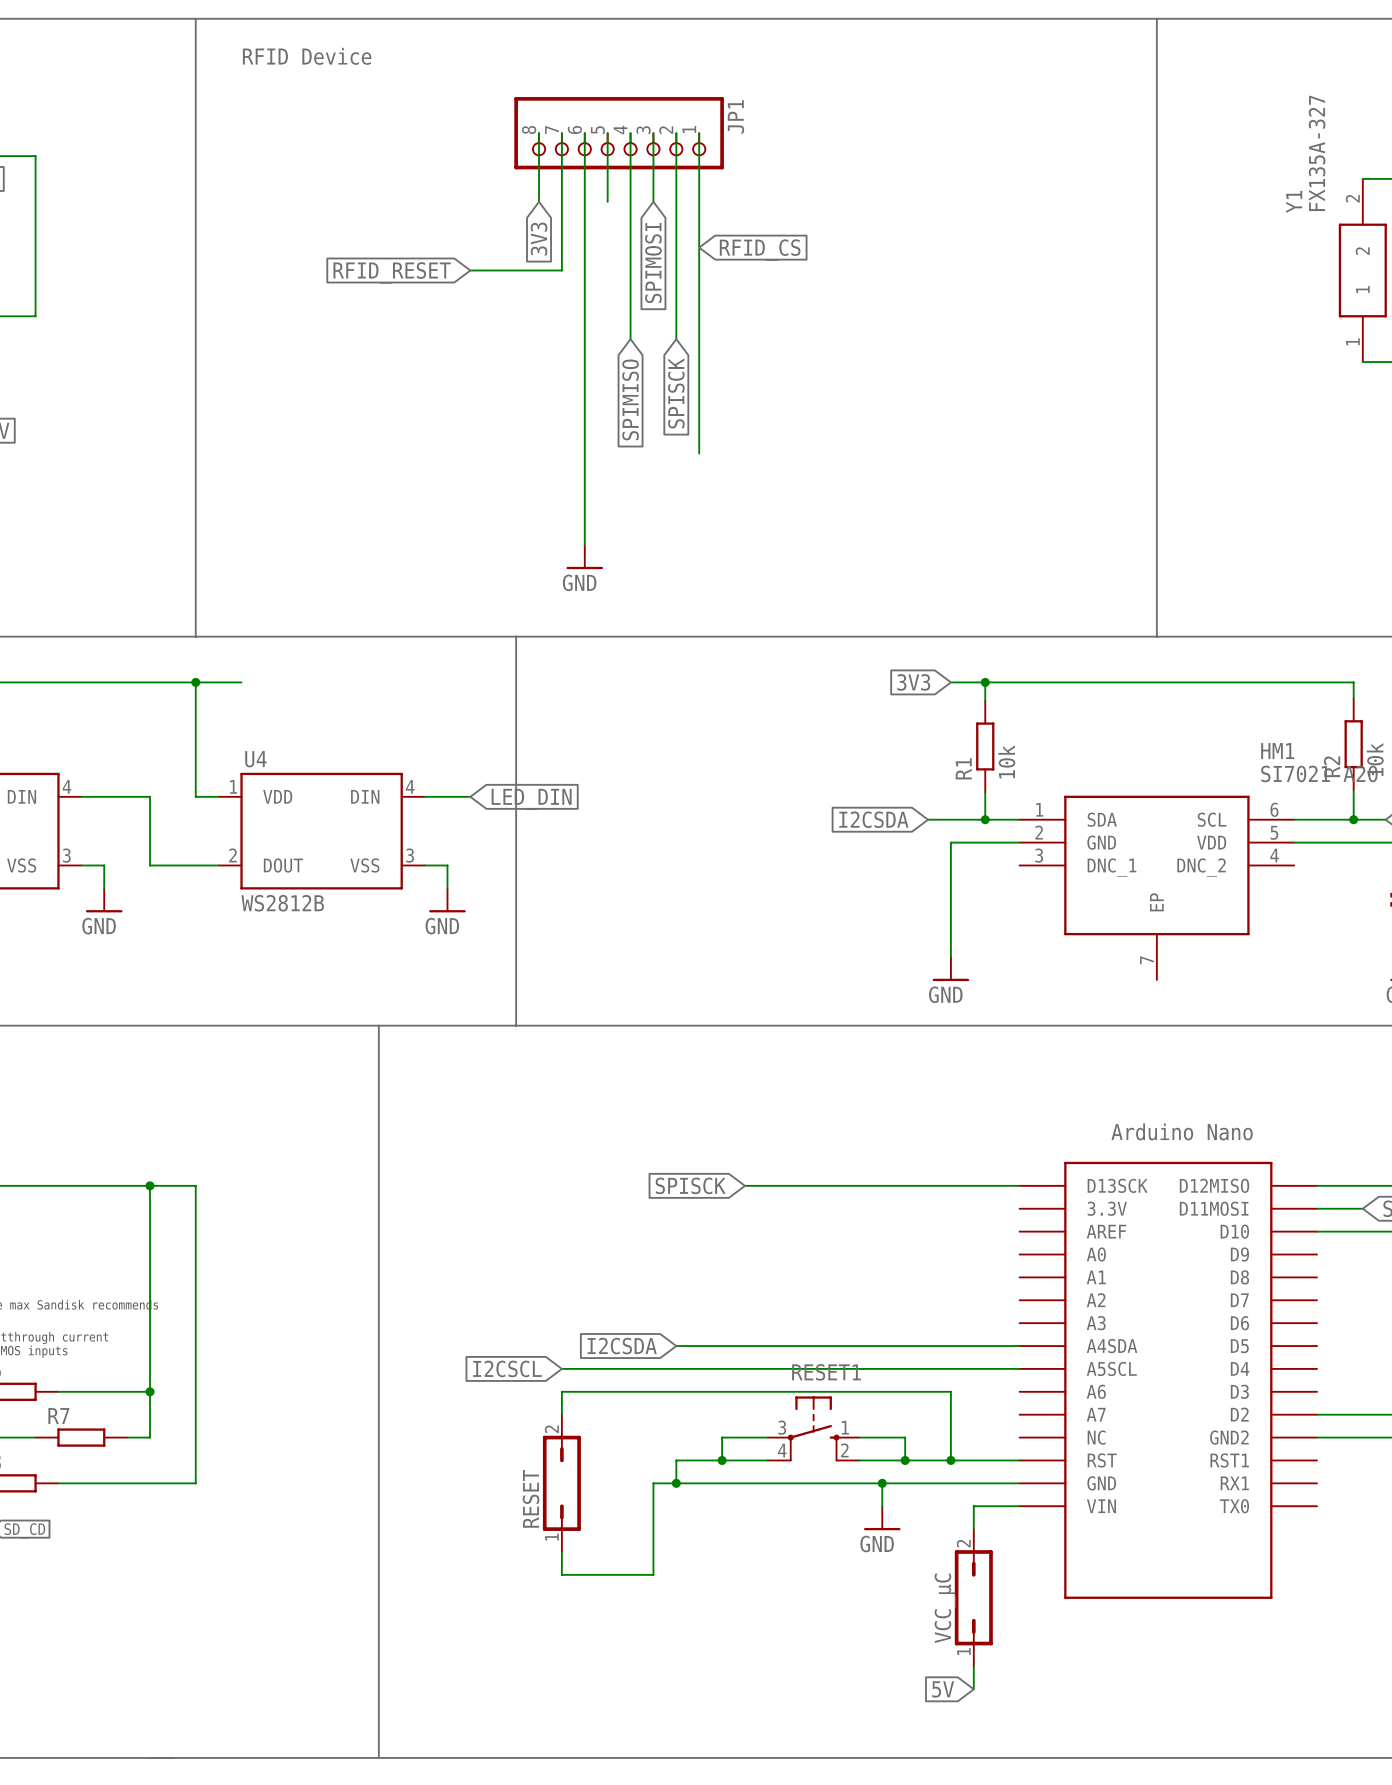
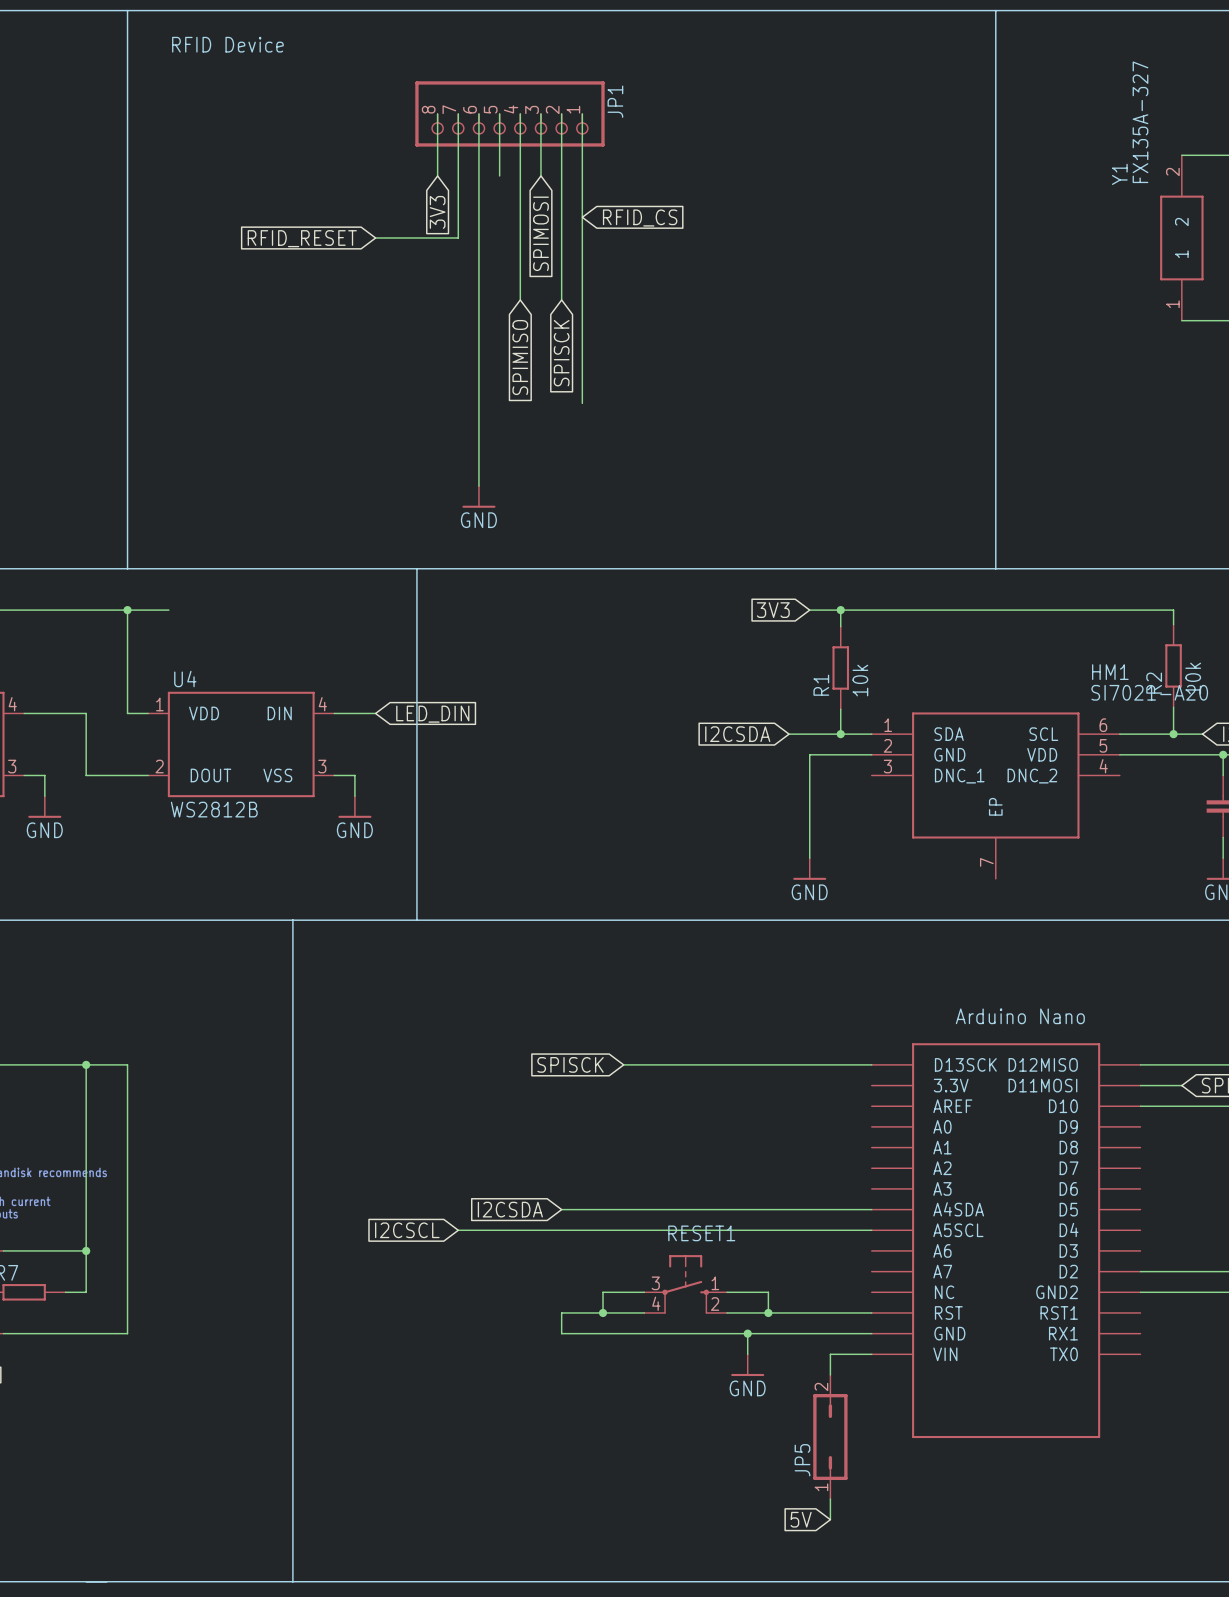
wire: (561, 1414) (561, 1391) (950, 1391) (950, 1460) -> none
junction: (950, 1460) -> none
RESET: (561, 1483) -> none
wire: (676, 1483) (653, 1483) (653, 1574) (561, 1574) (561, 1551) -> none
junction: (676, 1483) -> none
VCC_µC name: VCC_µC (945, 1608) -> JP5 (802, 1460)

